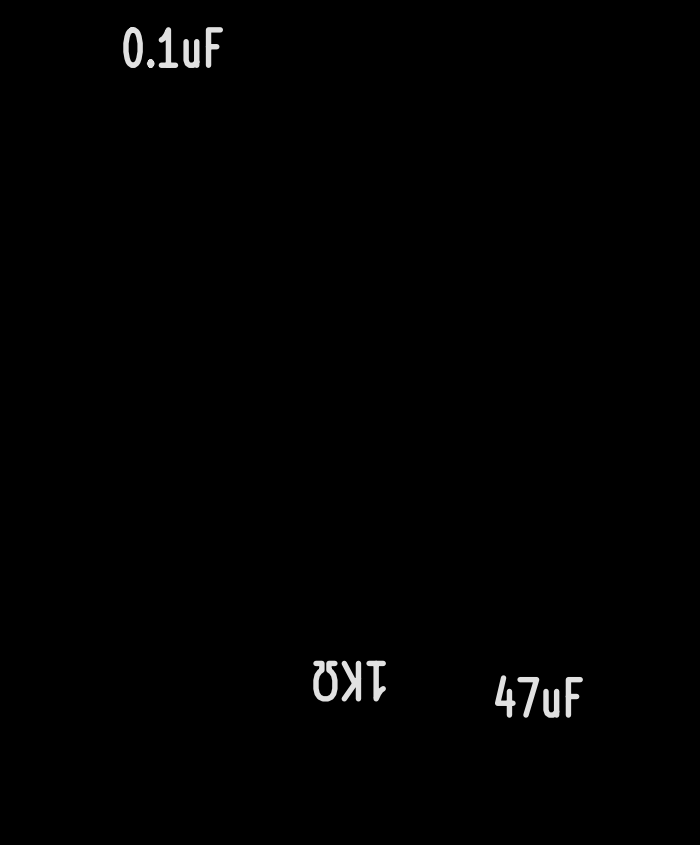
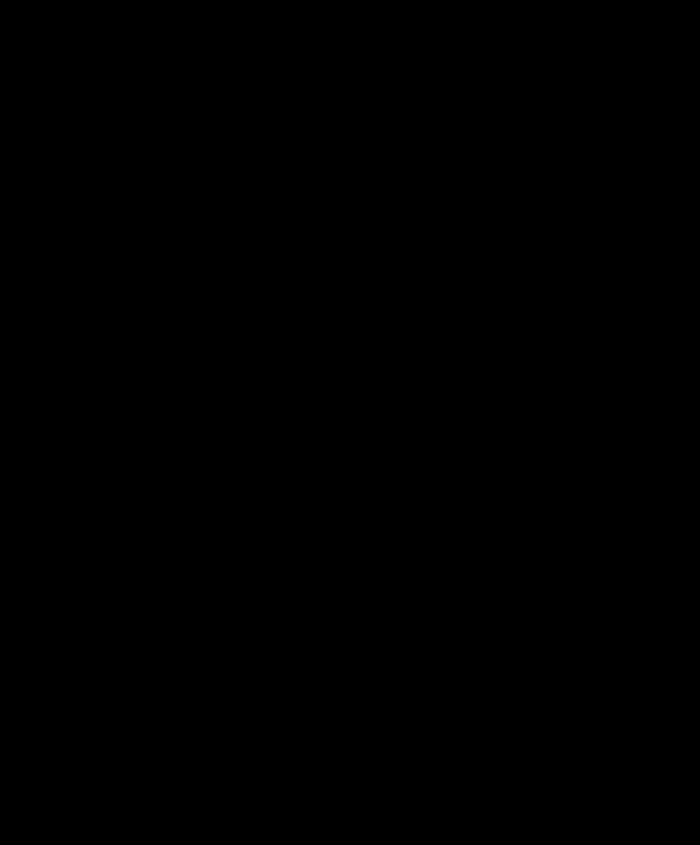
text: 0.1uF (173, 47) -> none
text: 1KΩ (349, 681) -> none
text: 47uF (538, 696) -> none

